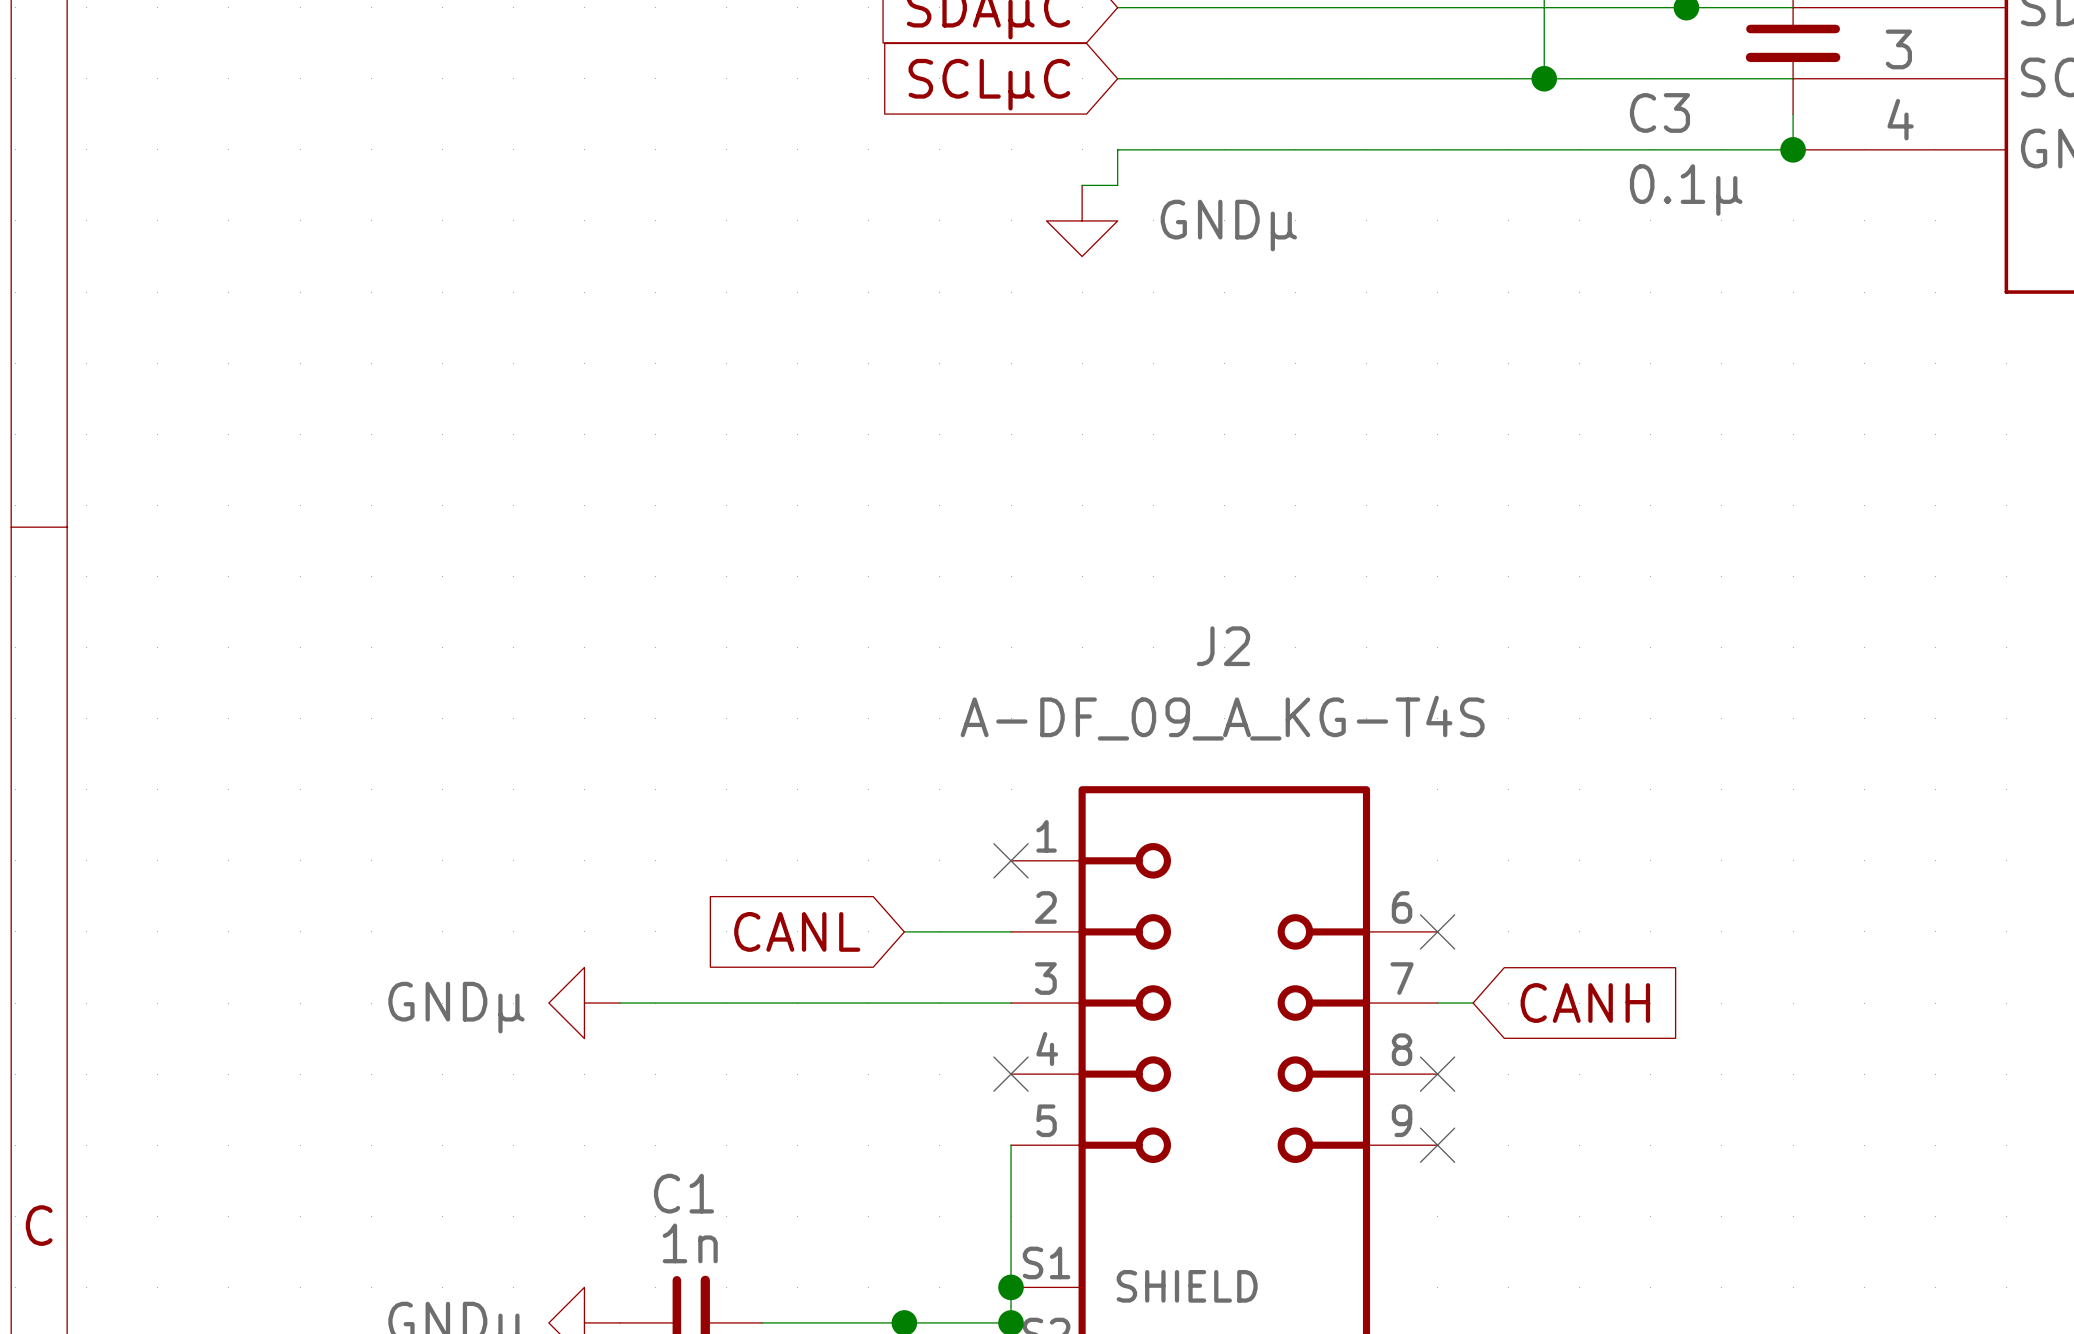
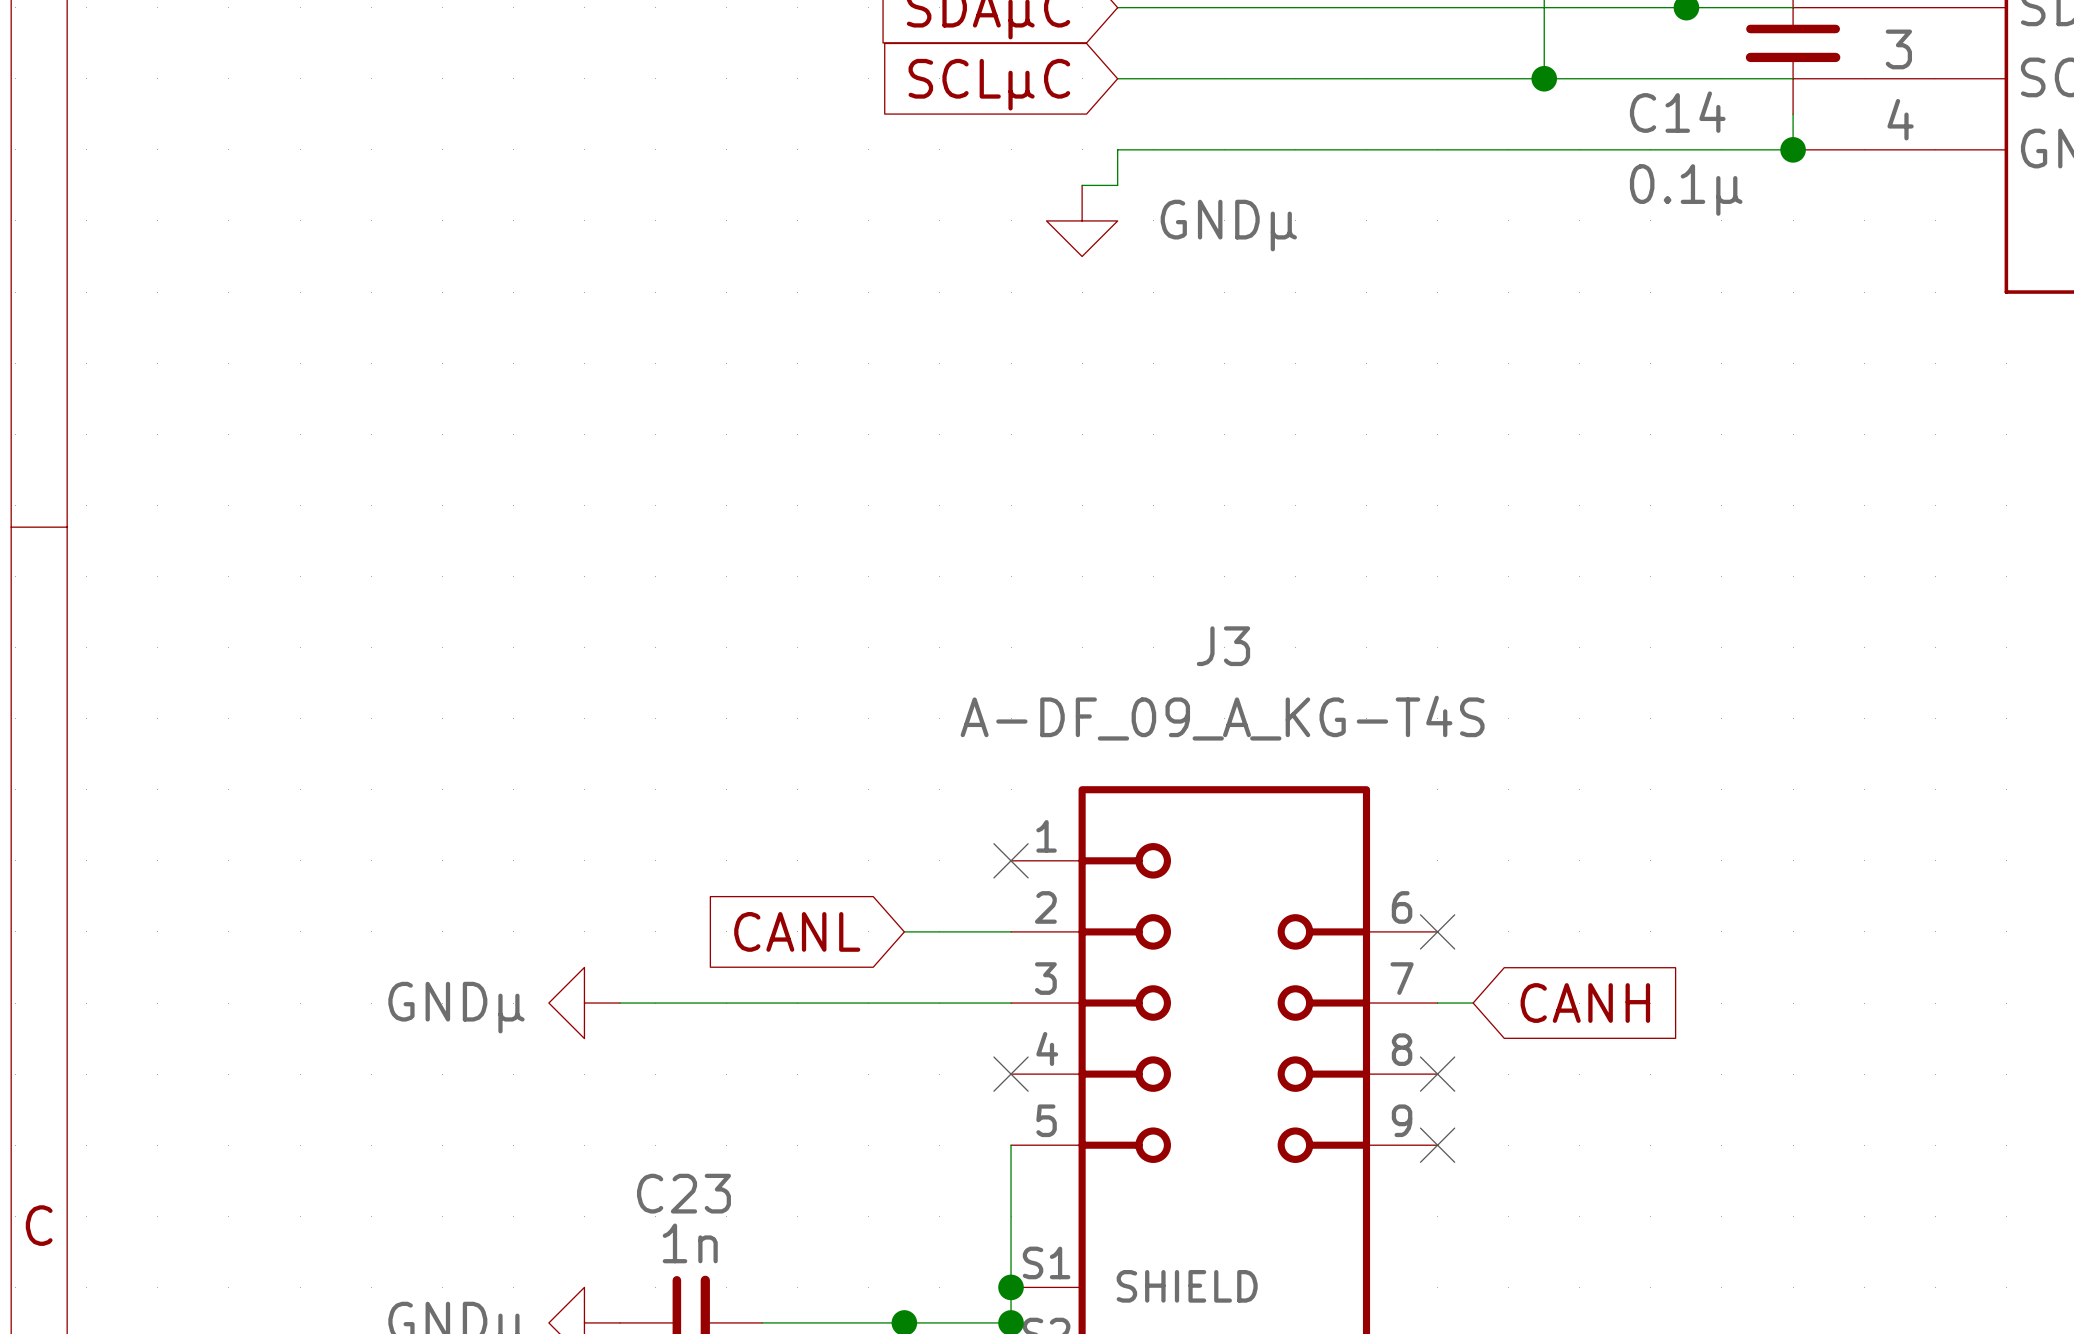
C3 name: C3 (1659, 112) -> C14 (1677, 112)
J2 name: J2 (1223, 646) -> J3 (1223, 646)
C1 name: C1 (683, 1193) -> C23 (683, 1193)

